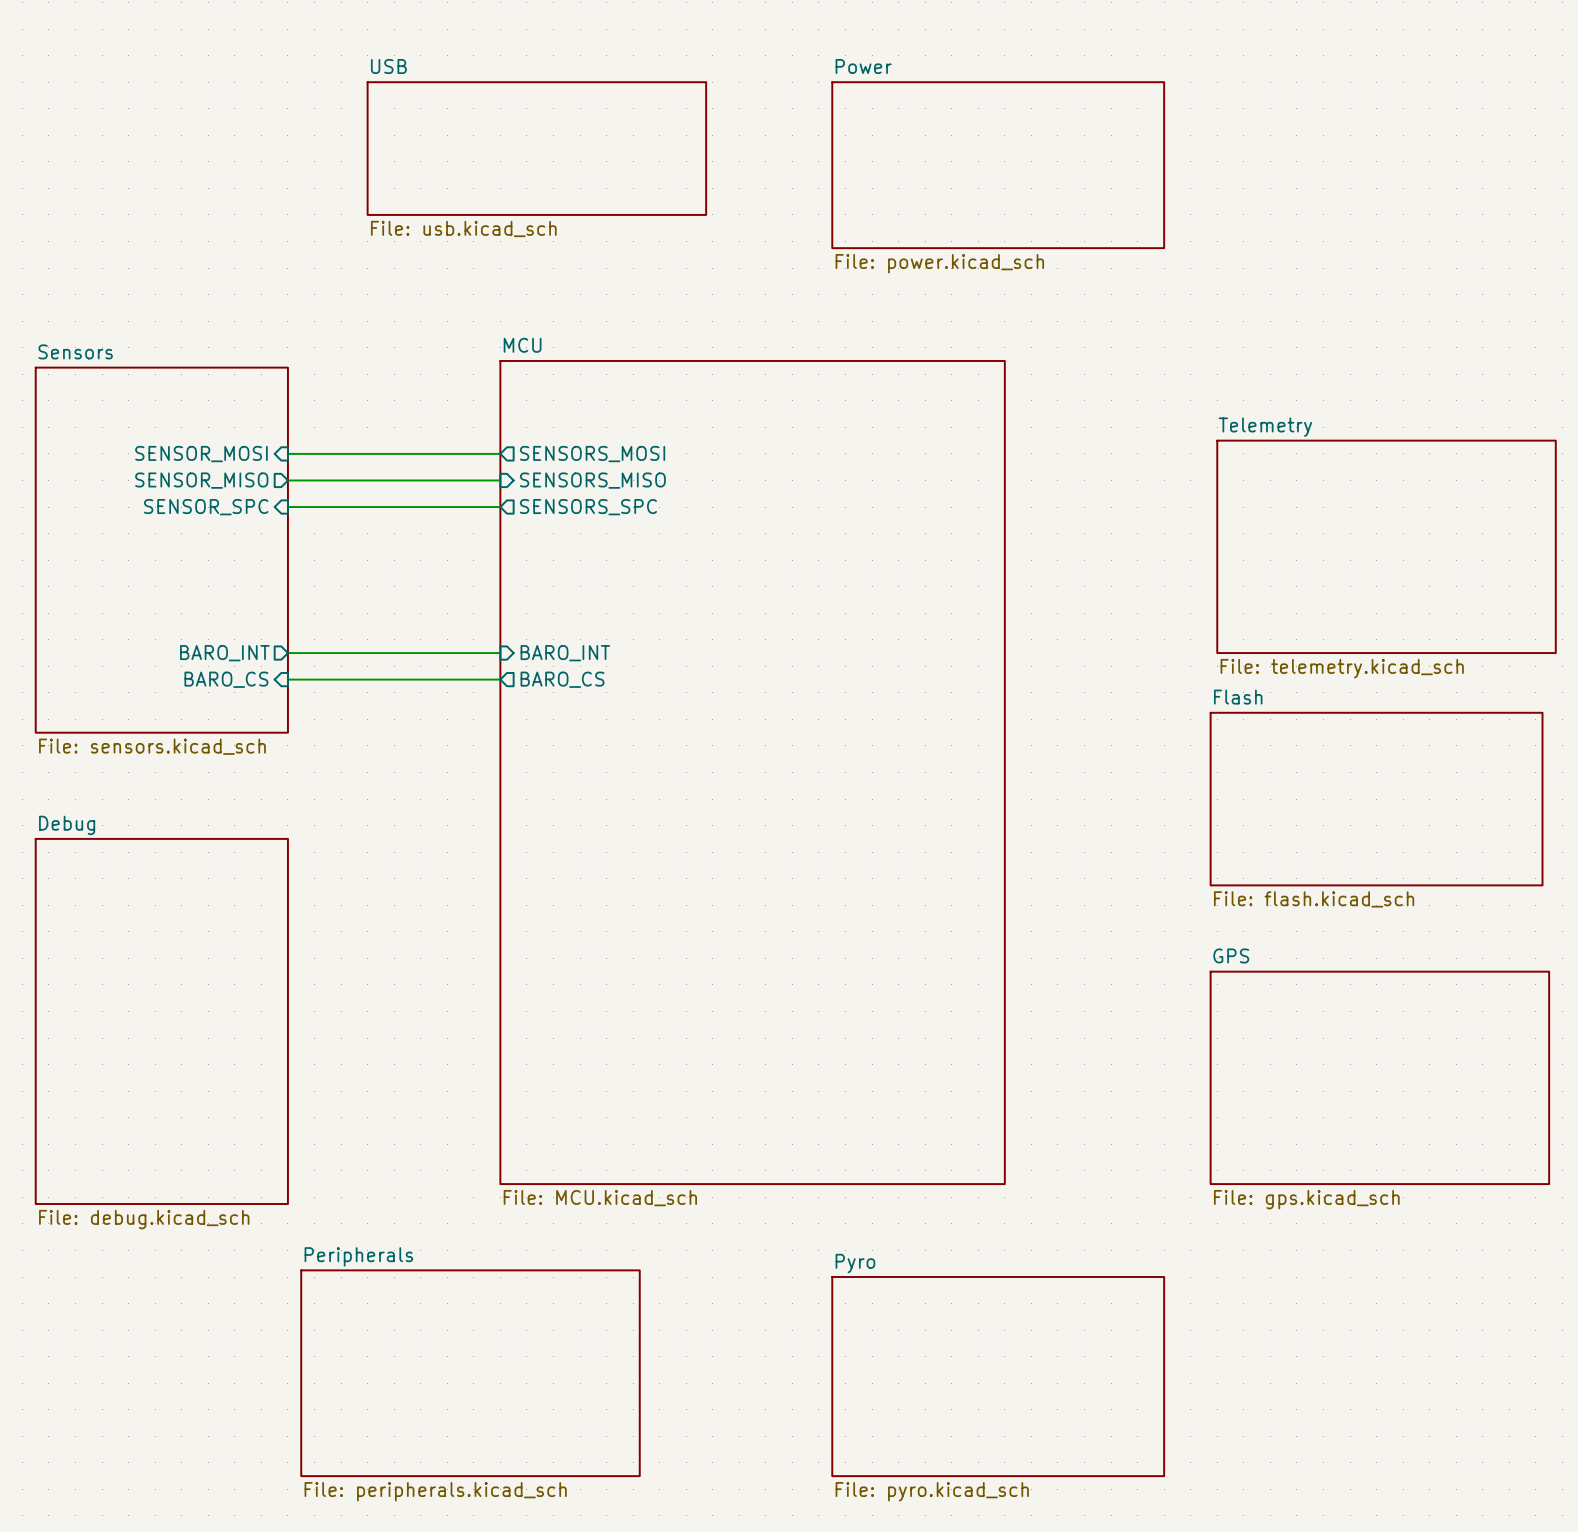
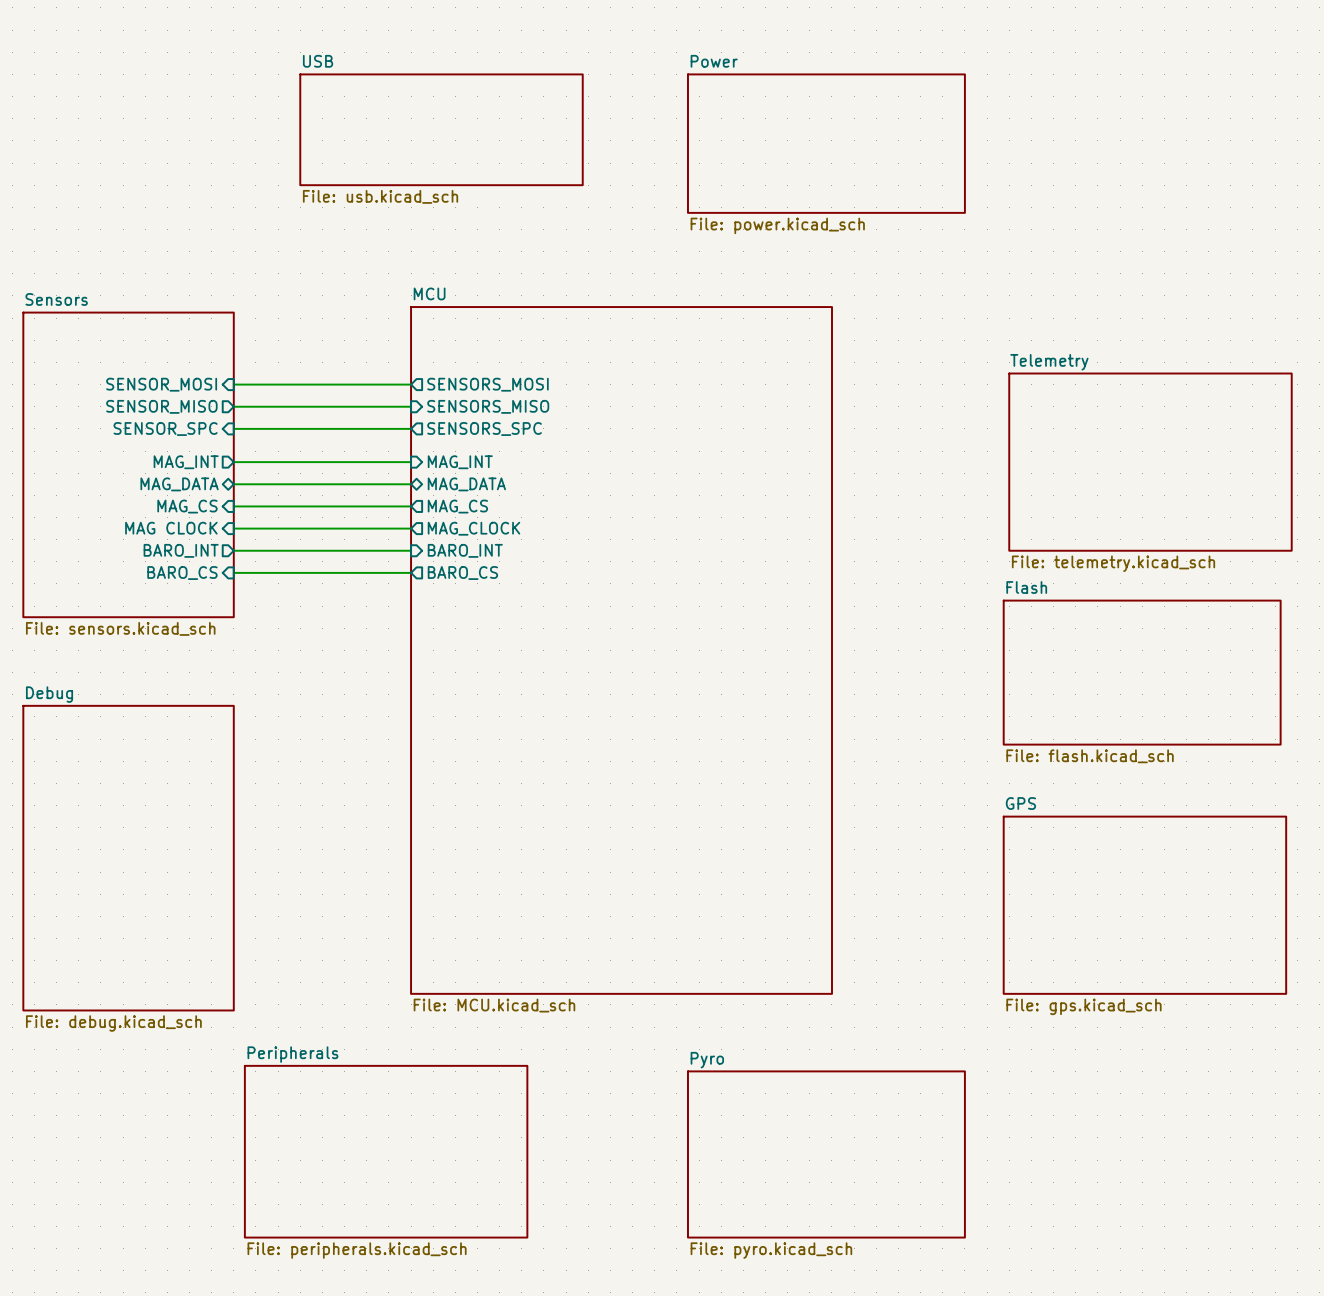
sheet pin: none -> MAG_INT (186, 462)
wire: none -> (233, 462) (411, 462)
sheet pin: none -> MAG_INT (460, 462)
sheet pin: none -> MAG_DATA (179, 484)
wire: none -> (233, 484) (411, 484)
sheet pin: none -> MAG_DATA (466, 484)
wire: none -> (233, 506) (411, 506)
sheet pin: none -> MAG_CS (187, 506)
sheet pin: none -> MAG_CS (457, 506)
sheet pin: none -> MAG CLOCK (171, 528)
wire: none -> (233, 528) (411, 528)
sheet pin: none -> MAG_CLOCK (473, 528)

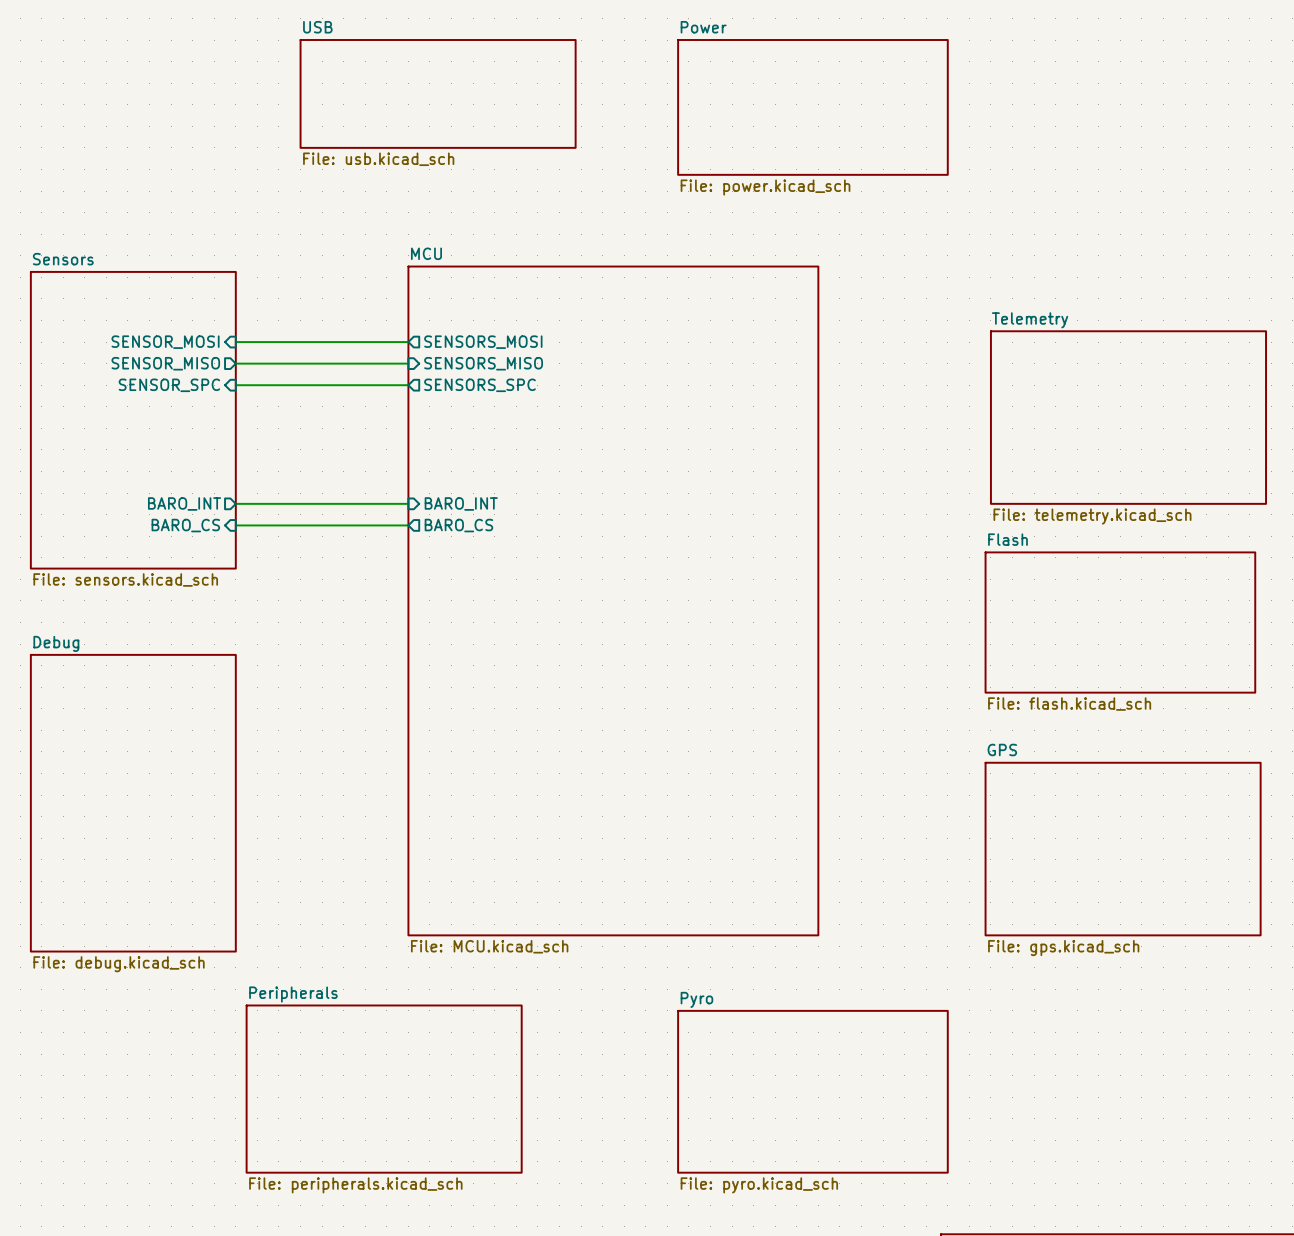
sheet pin: MAG_INT (186, 462) -> none
wire: (233, 462) (411, 462) -> none
sheet pin: MAG_INT (460, 462) -> none
sheet pin: MAG_DATA (179, 484) -> none
wire: (233, 484) (411, 484) -> none
sheet pin: MAG_DATA (466, 484) -> none
sheet pin: MAG_CS (187, 506) -> none
wire: (233, 506) (411, 506) -> none
sheet pin: MAG_CS (457, 506) -> none
sheet pin: MAG CLOCK (171, 528) -> none
wire: (233, 528) (411, 528) -> none
sheet pin: MAG_CLOCK (473, 528) -> none

